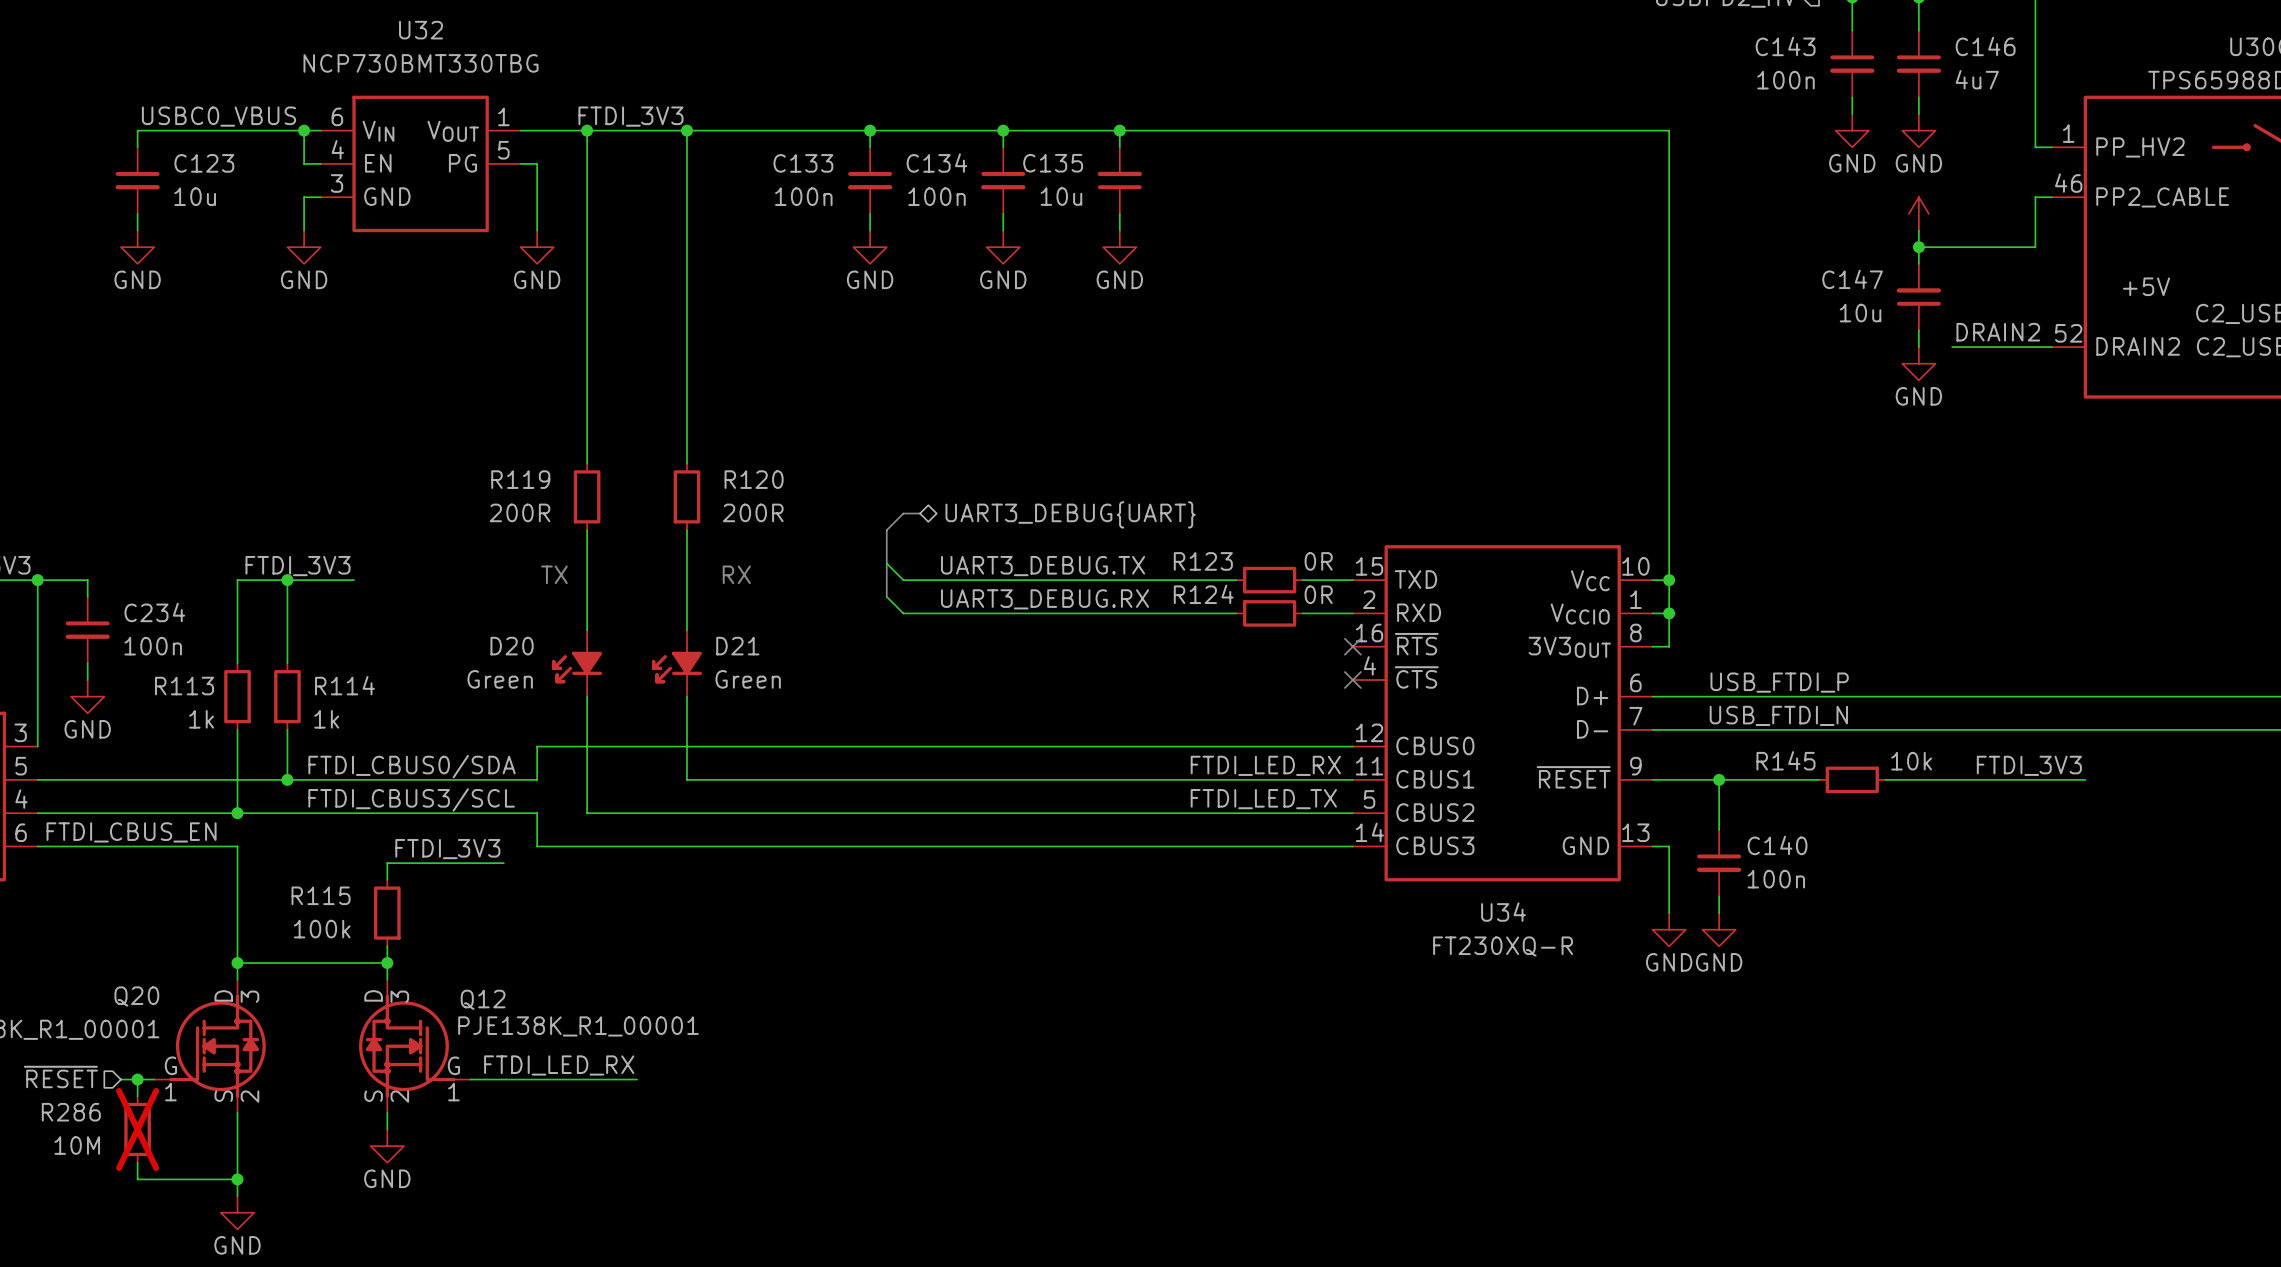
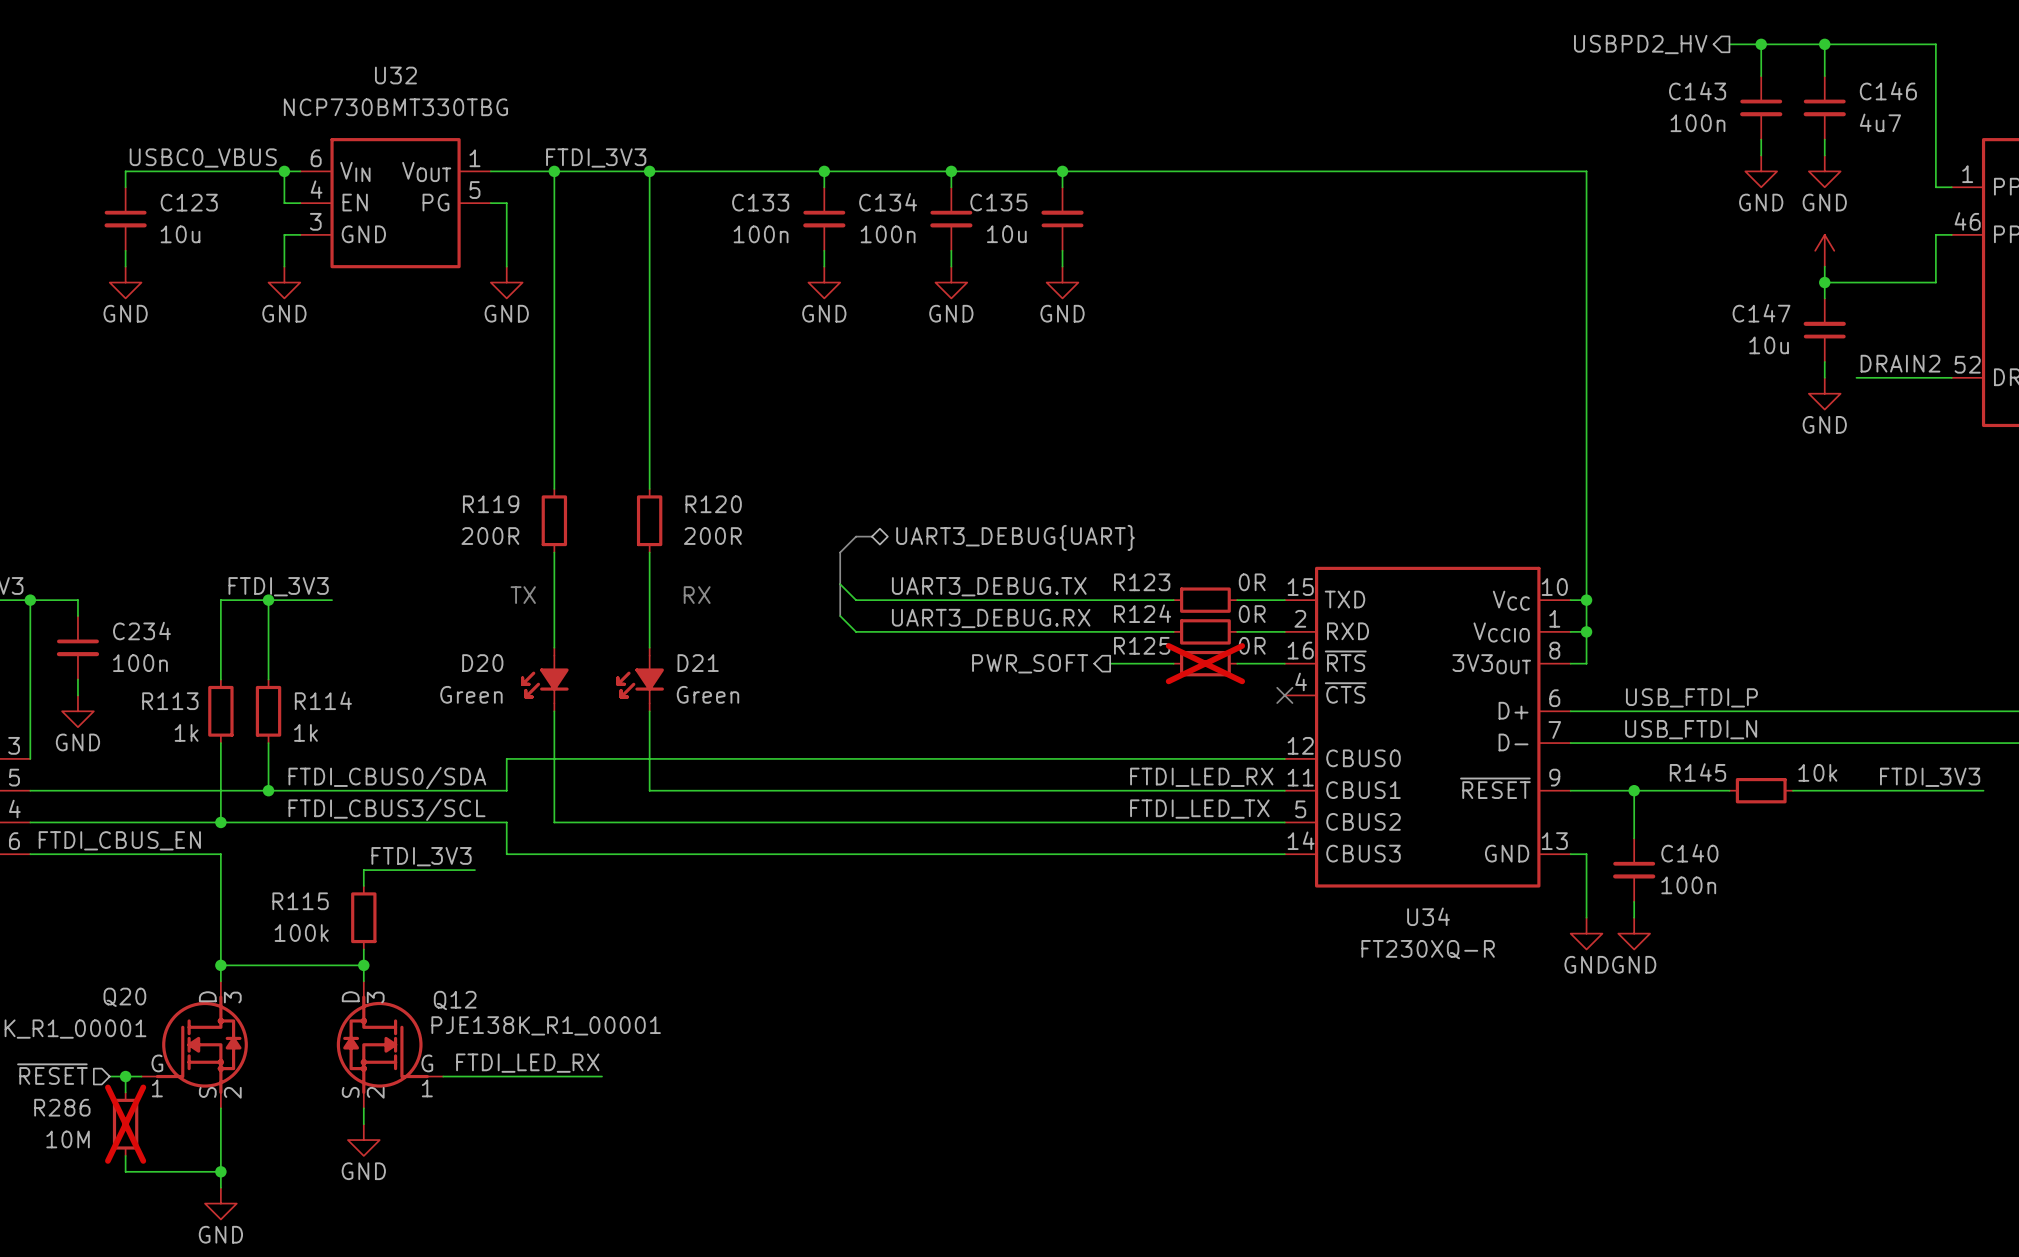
hierarchical label: none -> PWR_SOFT (1030, 663)
wire: none -> (1110, 663) (1173, 663)
R125: none -> (1205, 663)
wire: none -> (1237, 663) (1284, 663)
no-connect mark: (1352, 646) -> none

